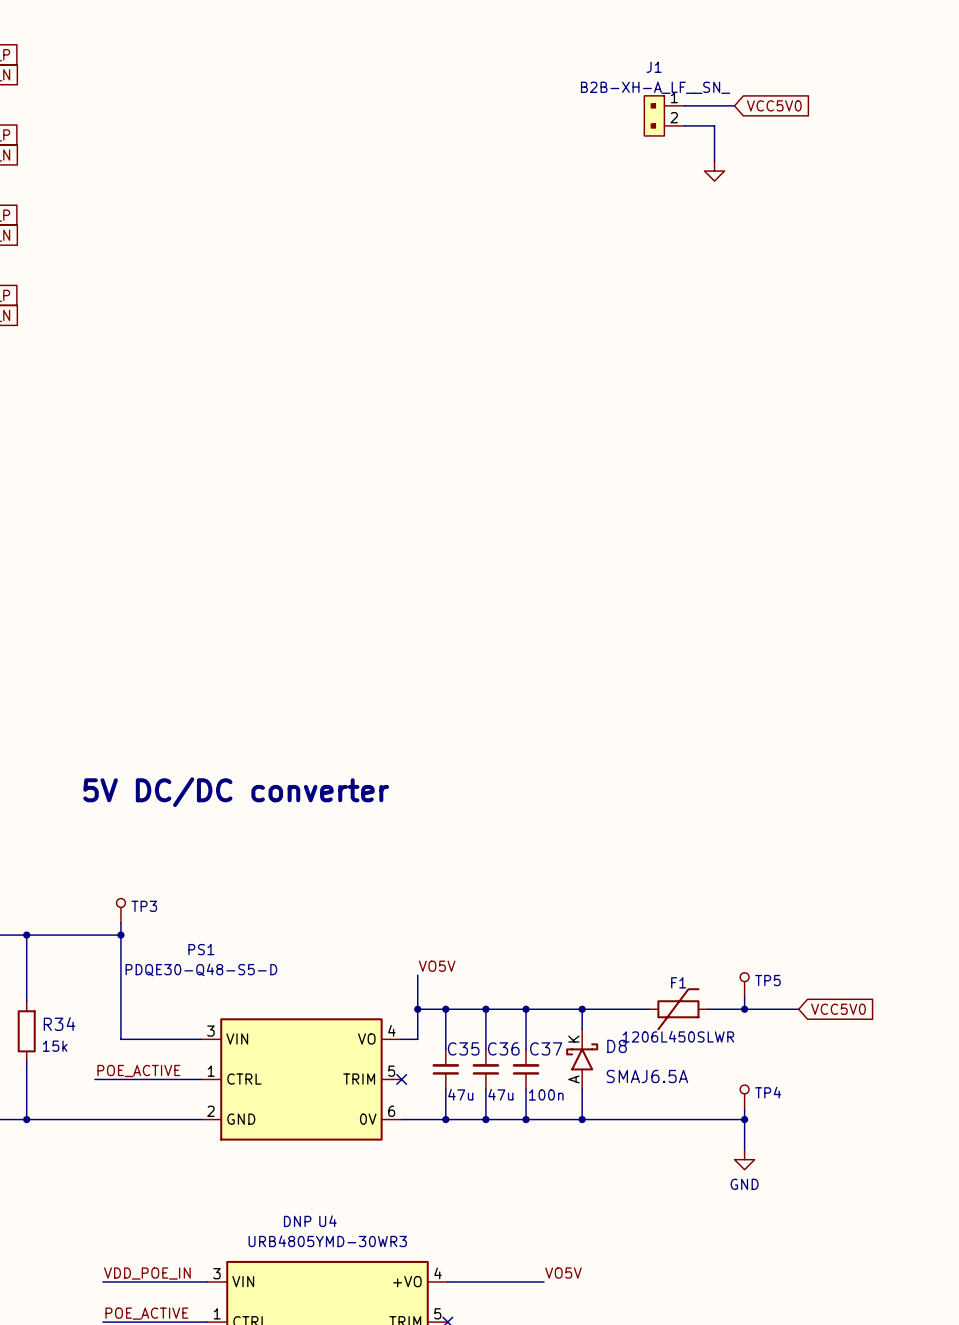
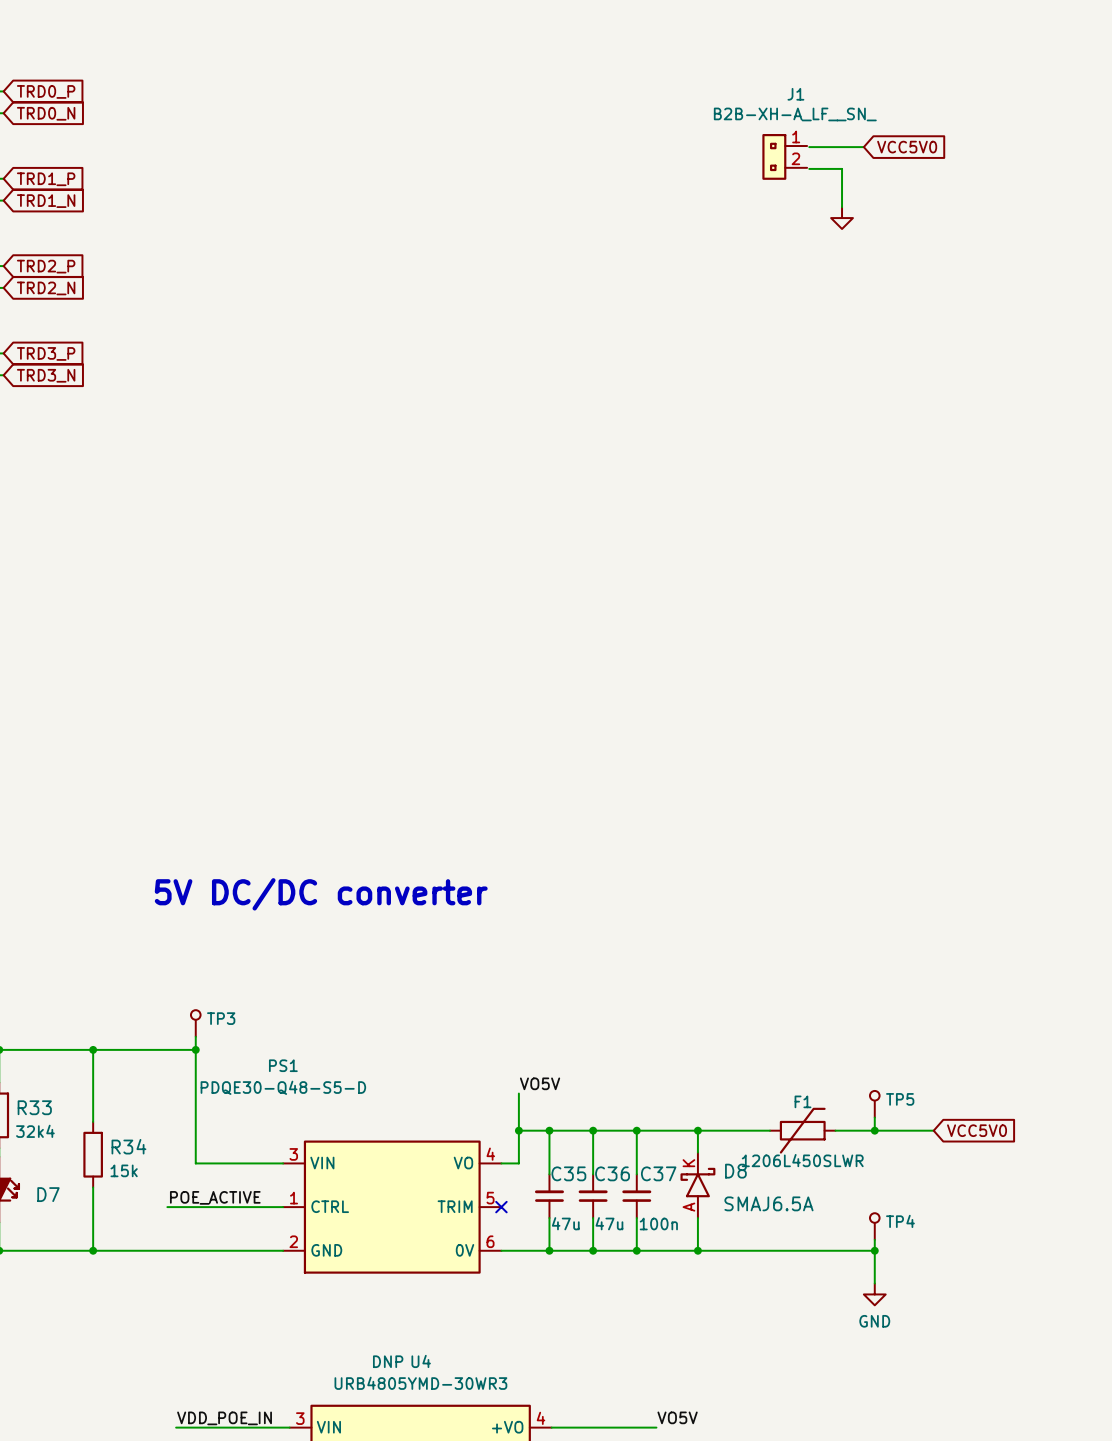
J1 name position: J1 (654, 67) -> J1 (795, 94)
J1 value position: B2B-XH-A_LF__SN_ (655, 87) -> B2B-XH-A_LF__SN_ (795, 114)
J1 symbol: [644, 95, 685, 136] -> [762, 134, 808, 180]

